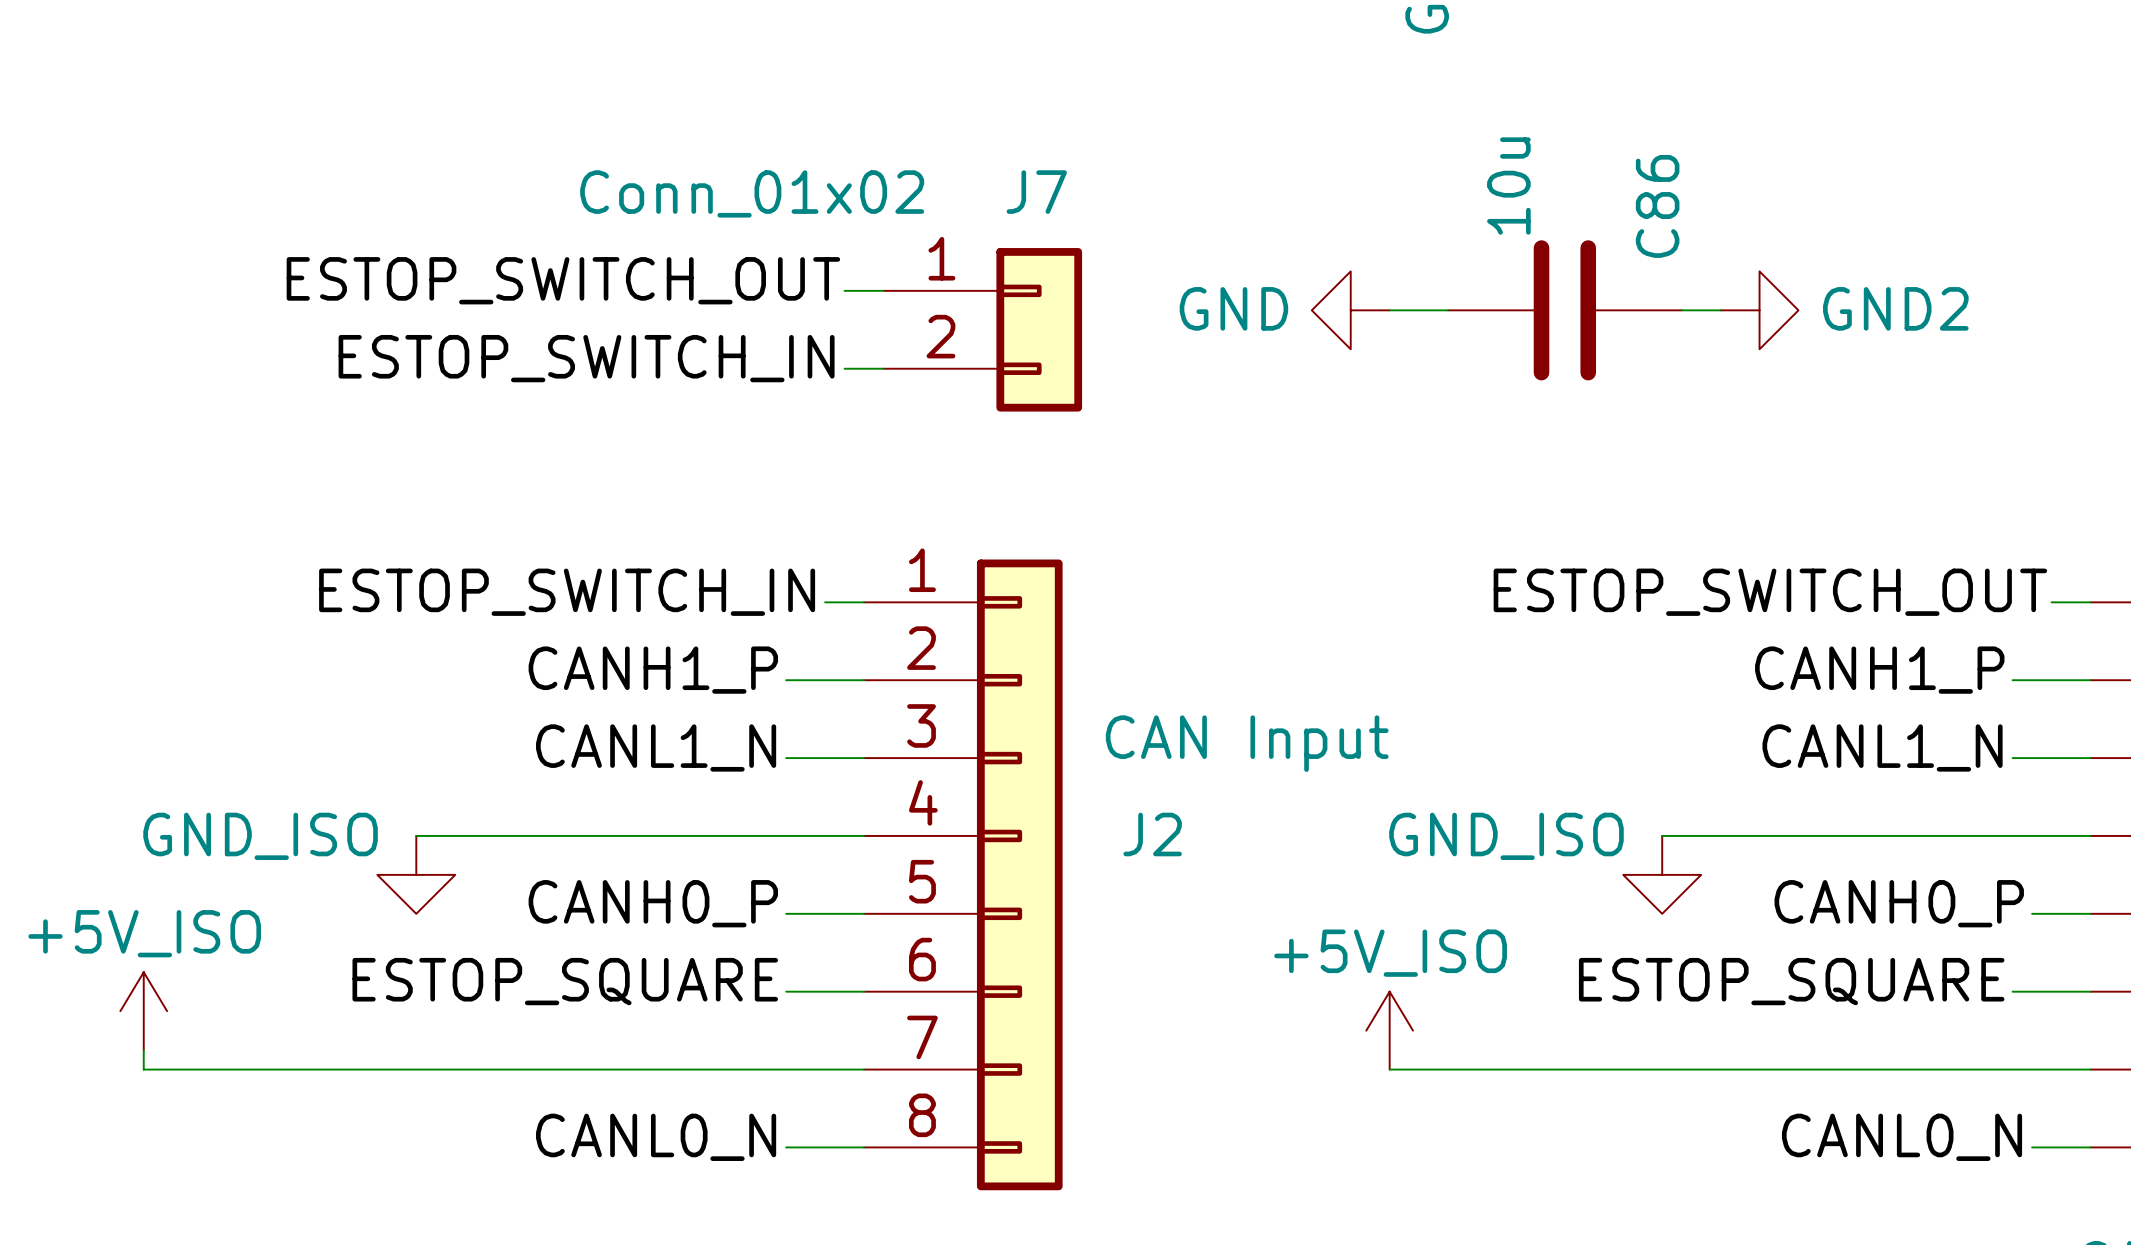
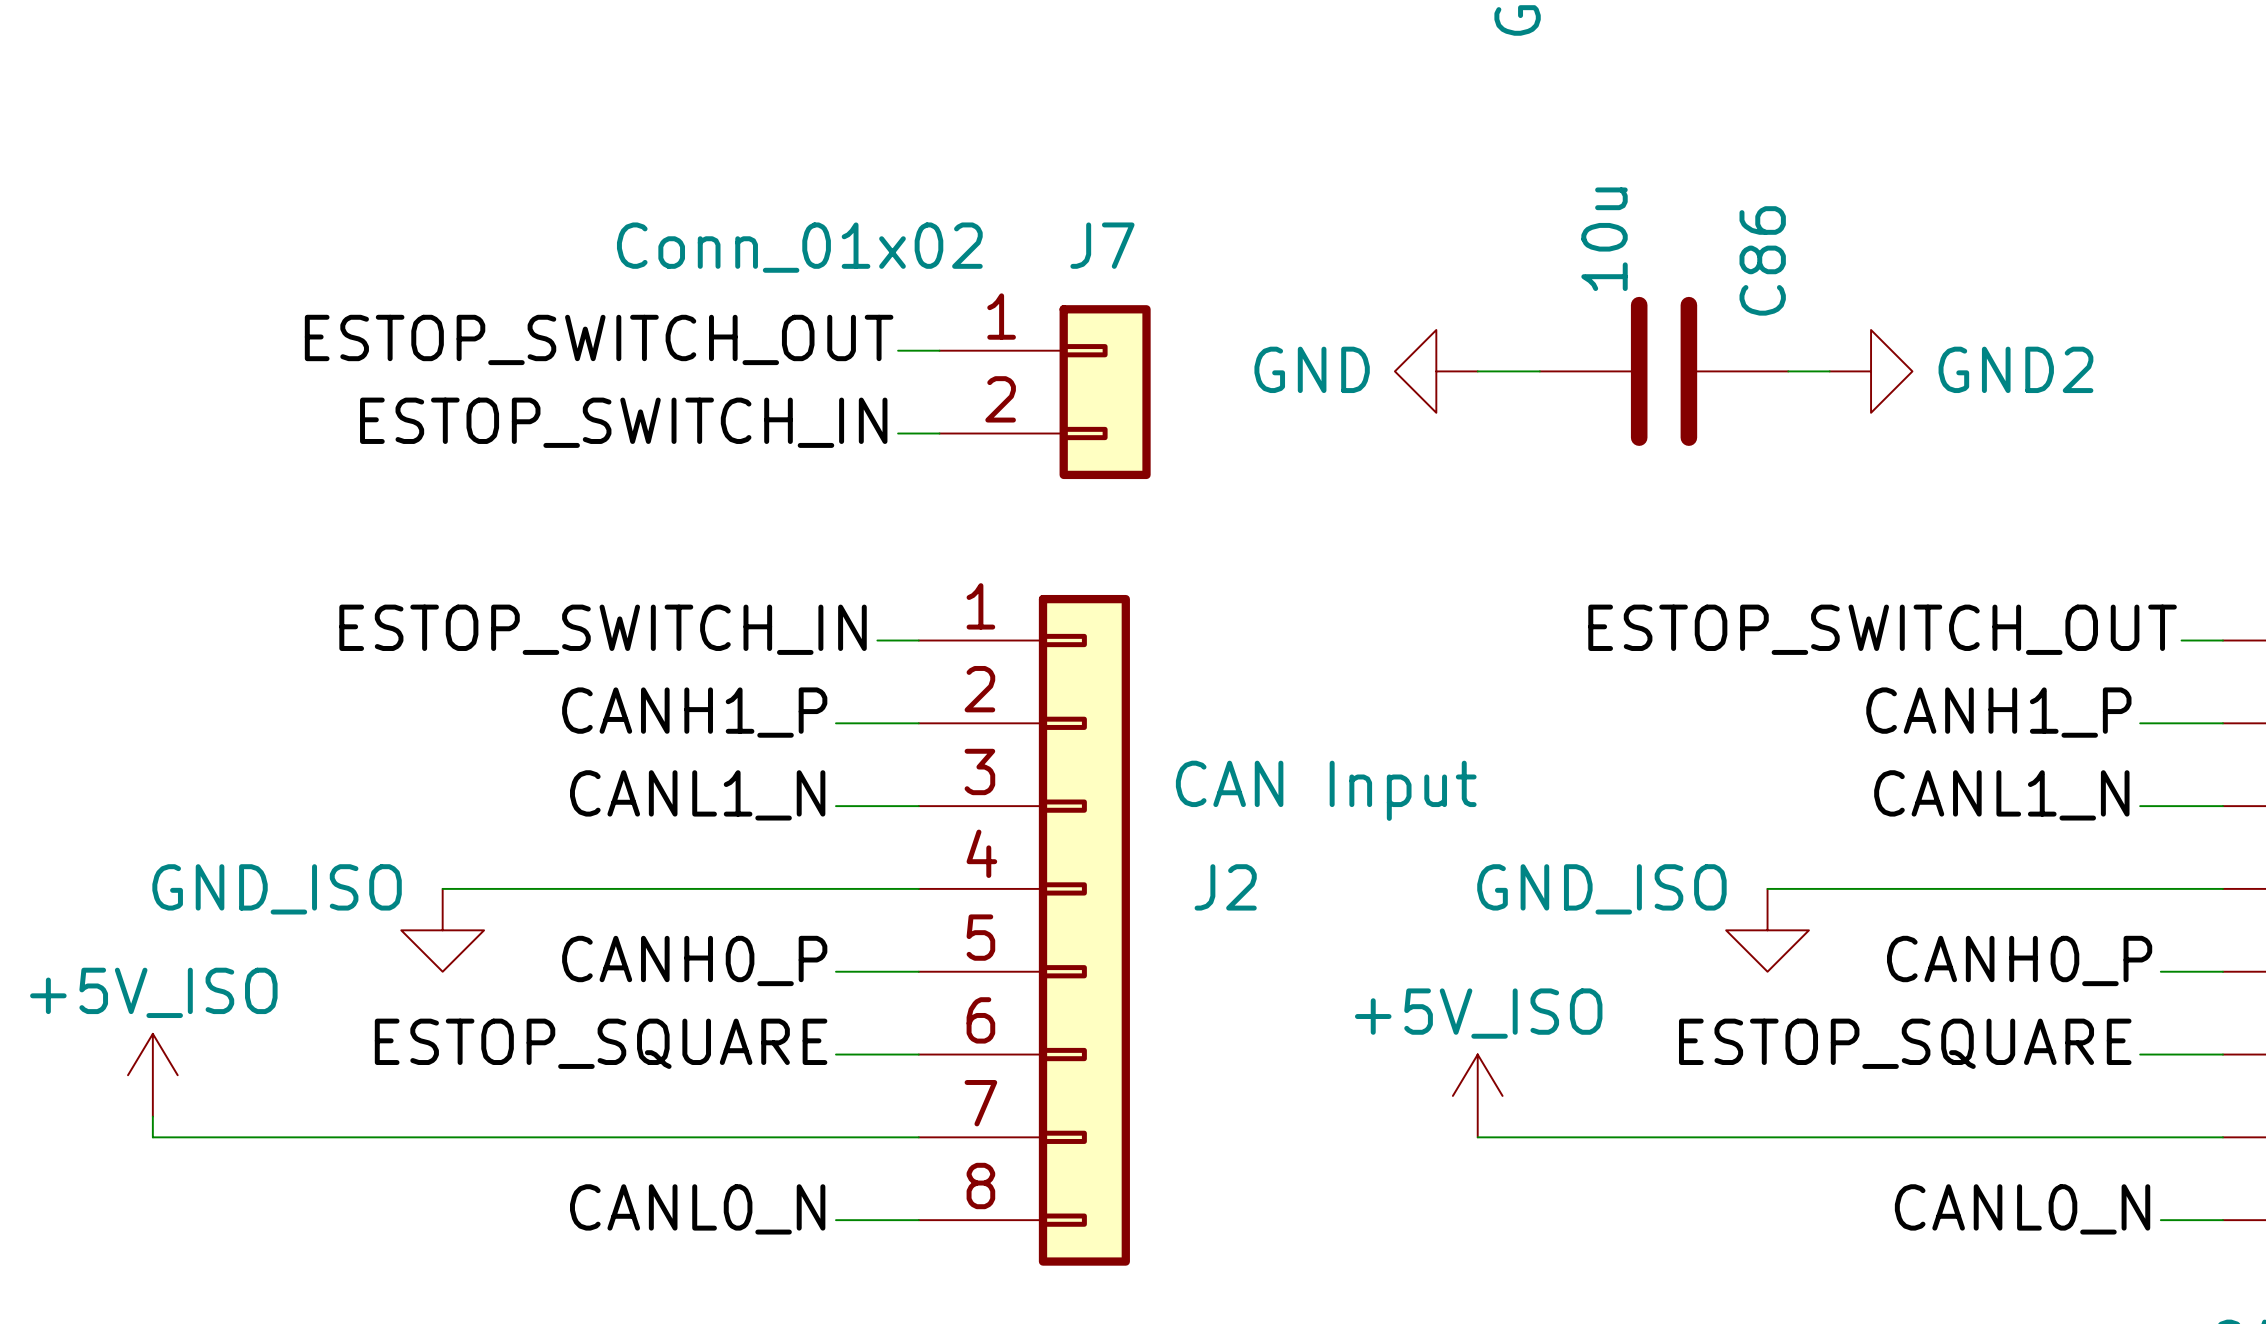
label position: ESTOP_SWITCH_OUT (563, 280) -> ESTOP_SWITCH_OUT (599, 339)
wire: (844, 290) (883, 290) -> (898, 350) (939, 350)
power symbol position: GND (1350, 310) -> GND (1436, 371)
wire: (1389, 310) (1448, 310) -> (1477, 371) (1539, 371)
C86 position: (1564, 310) -> (1664, 371)
wire: (1681, 310) (1720, 310) -> (1788, 371) (1829, 371)
power symbol position: GND2 (1759, 310) -> GND2 (1871, 371)
J7 position: (982, 329) -> (1045, 392)
label position: ESTOP_SWITCH_IN (586, 358) -> ESTOP_SWITCH_IN (623, 422)
wire: (844, 368) (883, 368) -> (898, 433) (939, 433)

